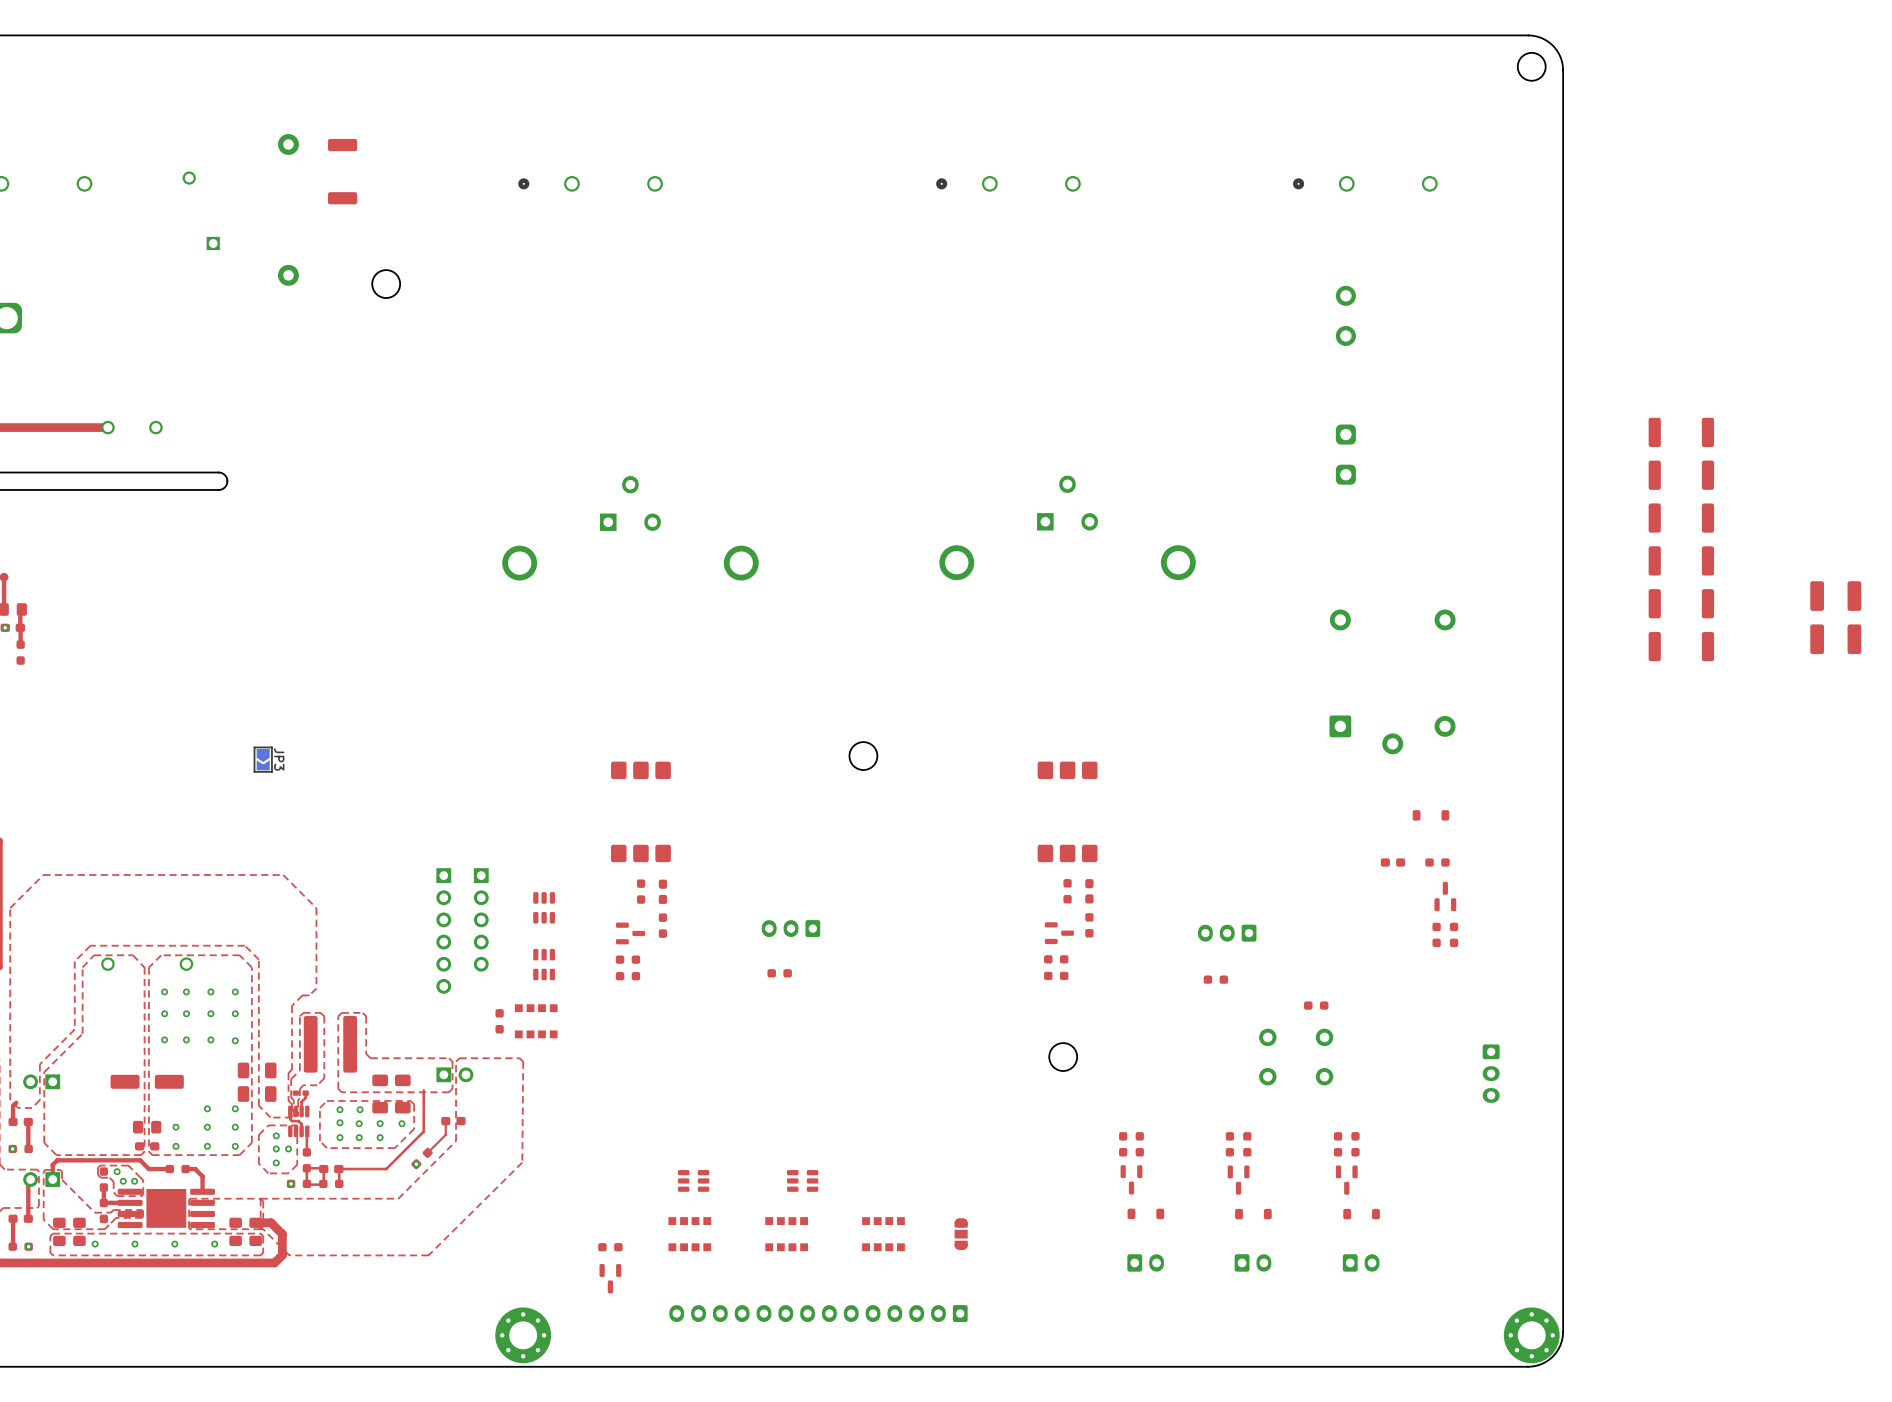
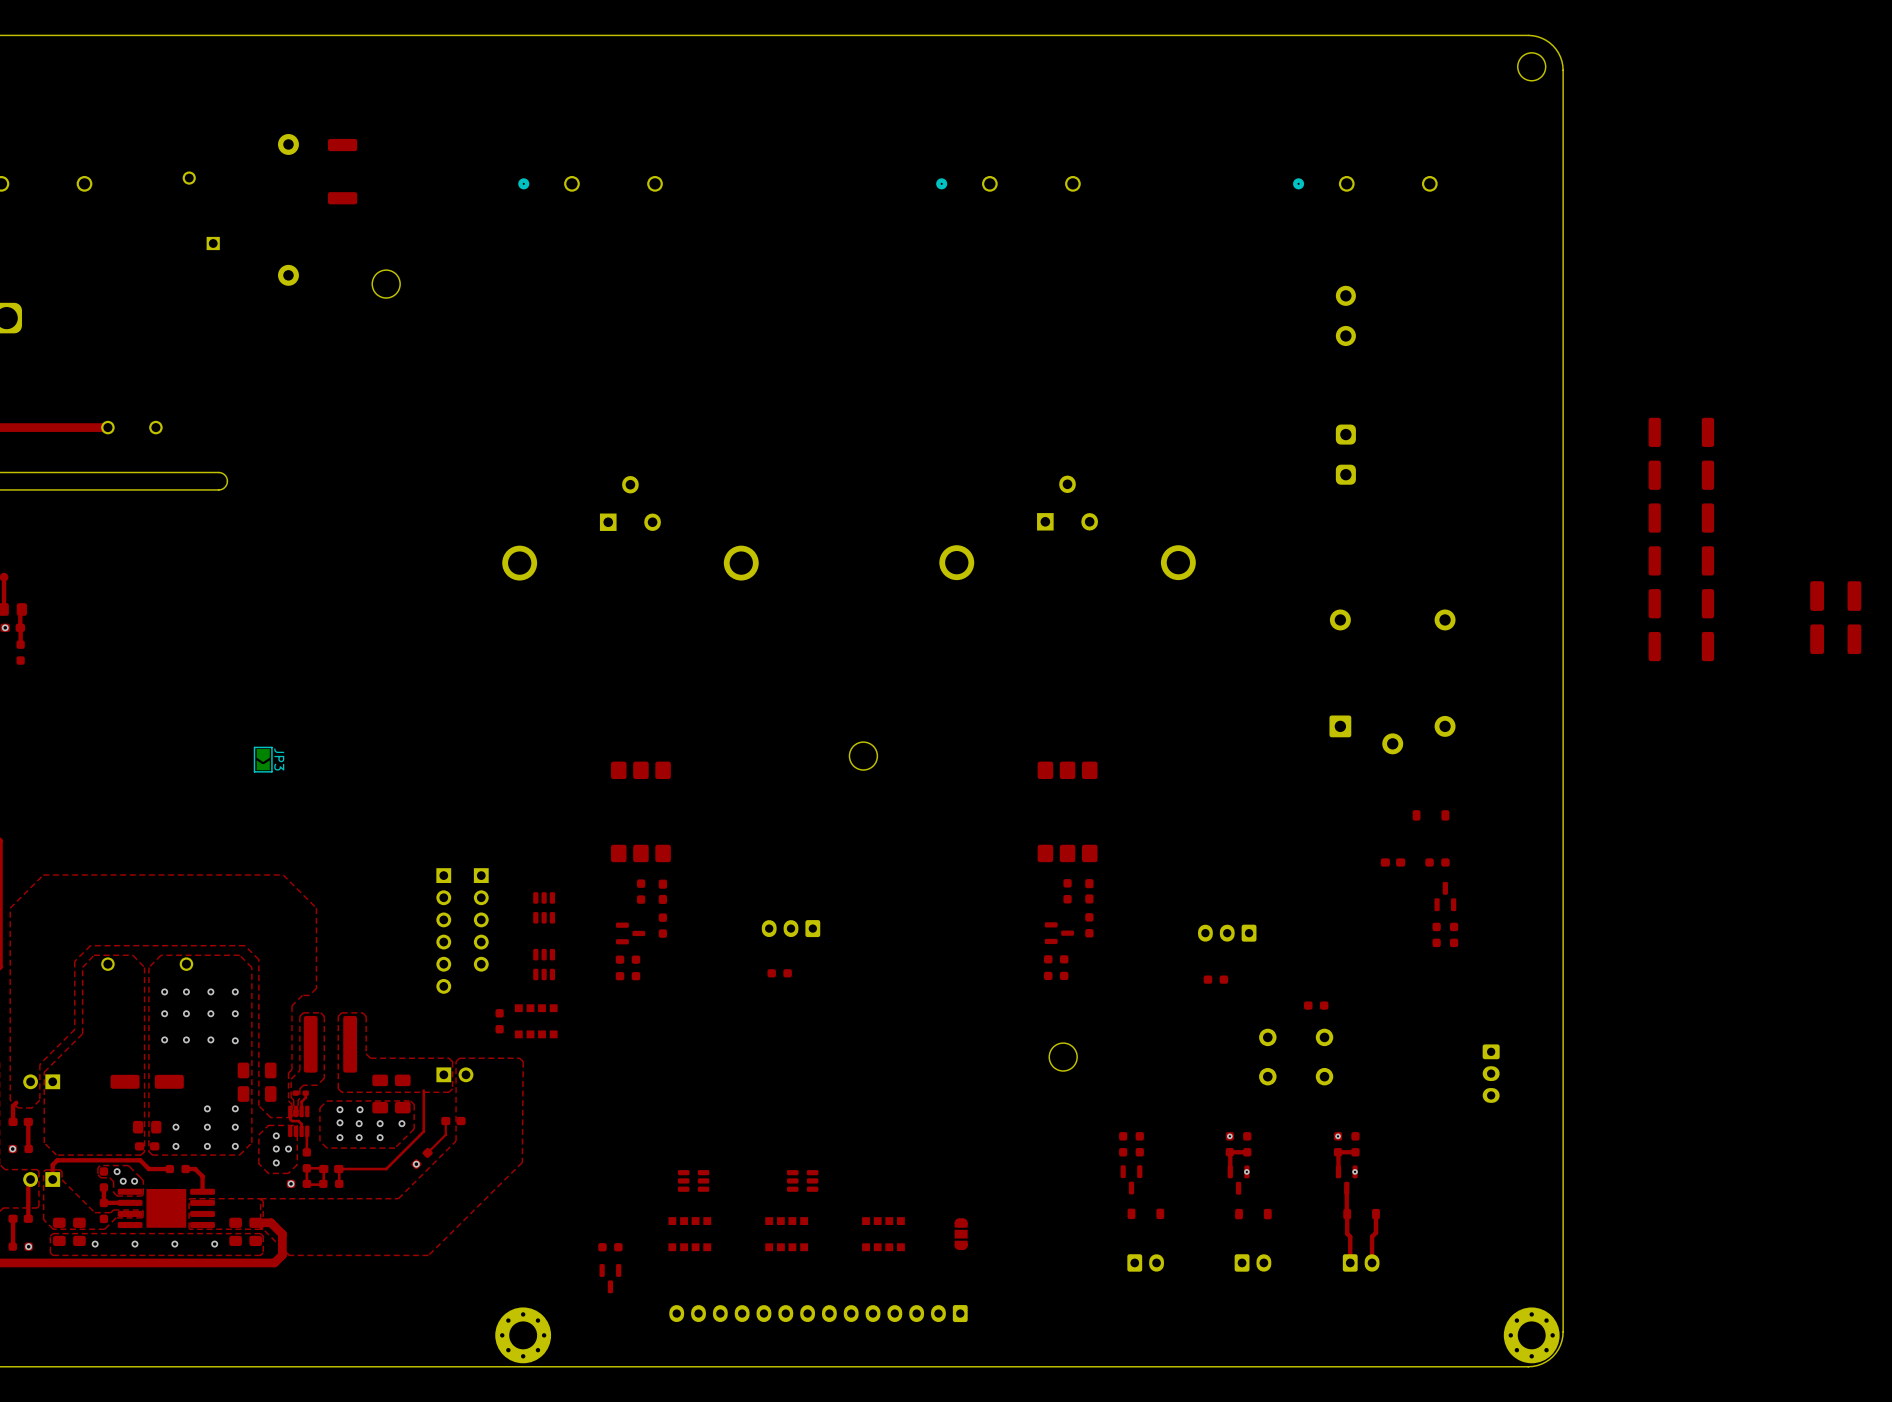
via: none -> (1229, 1136)
via: none -> (1338, 1136)
top track: none -> (1247, 1152) (1229, 1152) (1230, 1171)
top track: none -> (1355, 1152) (1338, 1152) (1338, 1171)
via: none -> (1246, 1171)
via: none -> (1355, 1171)
top track: none -> (1346, 1188) (1347, 1233) (1350, 1236) (1350, 1262)
top track: none -> (1375, 1214) (1375, 1232) (1372, 1236) (1372, 1262)

